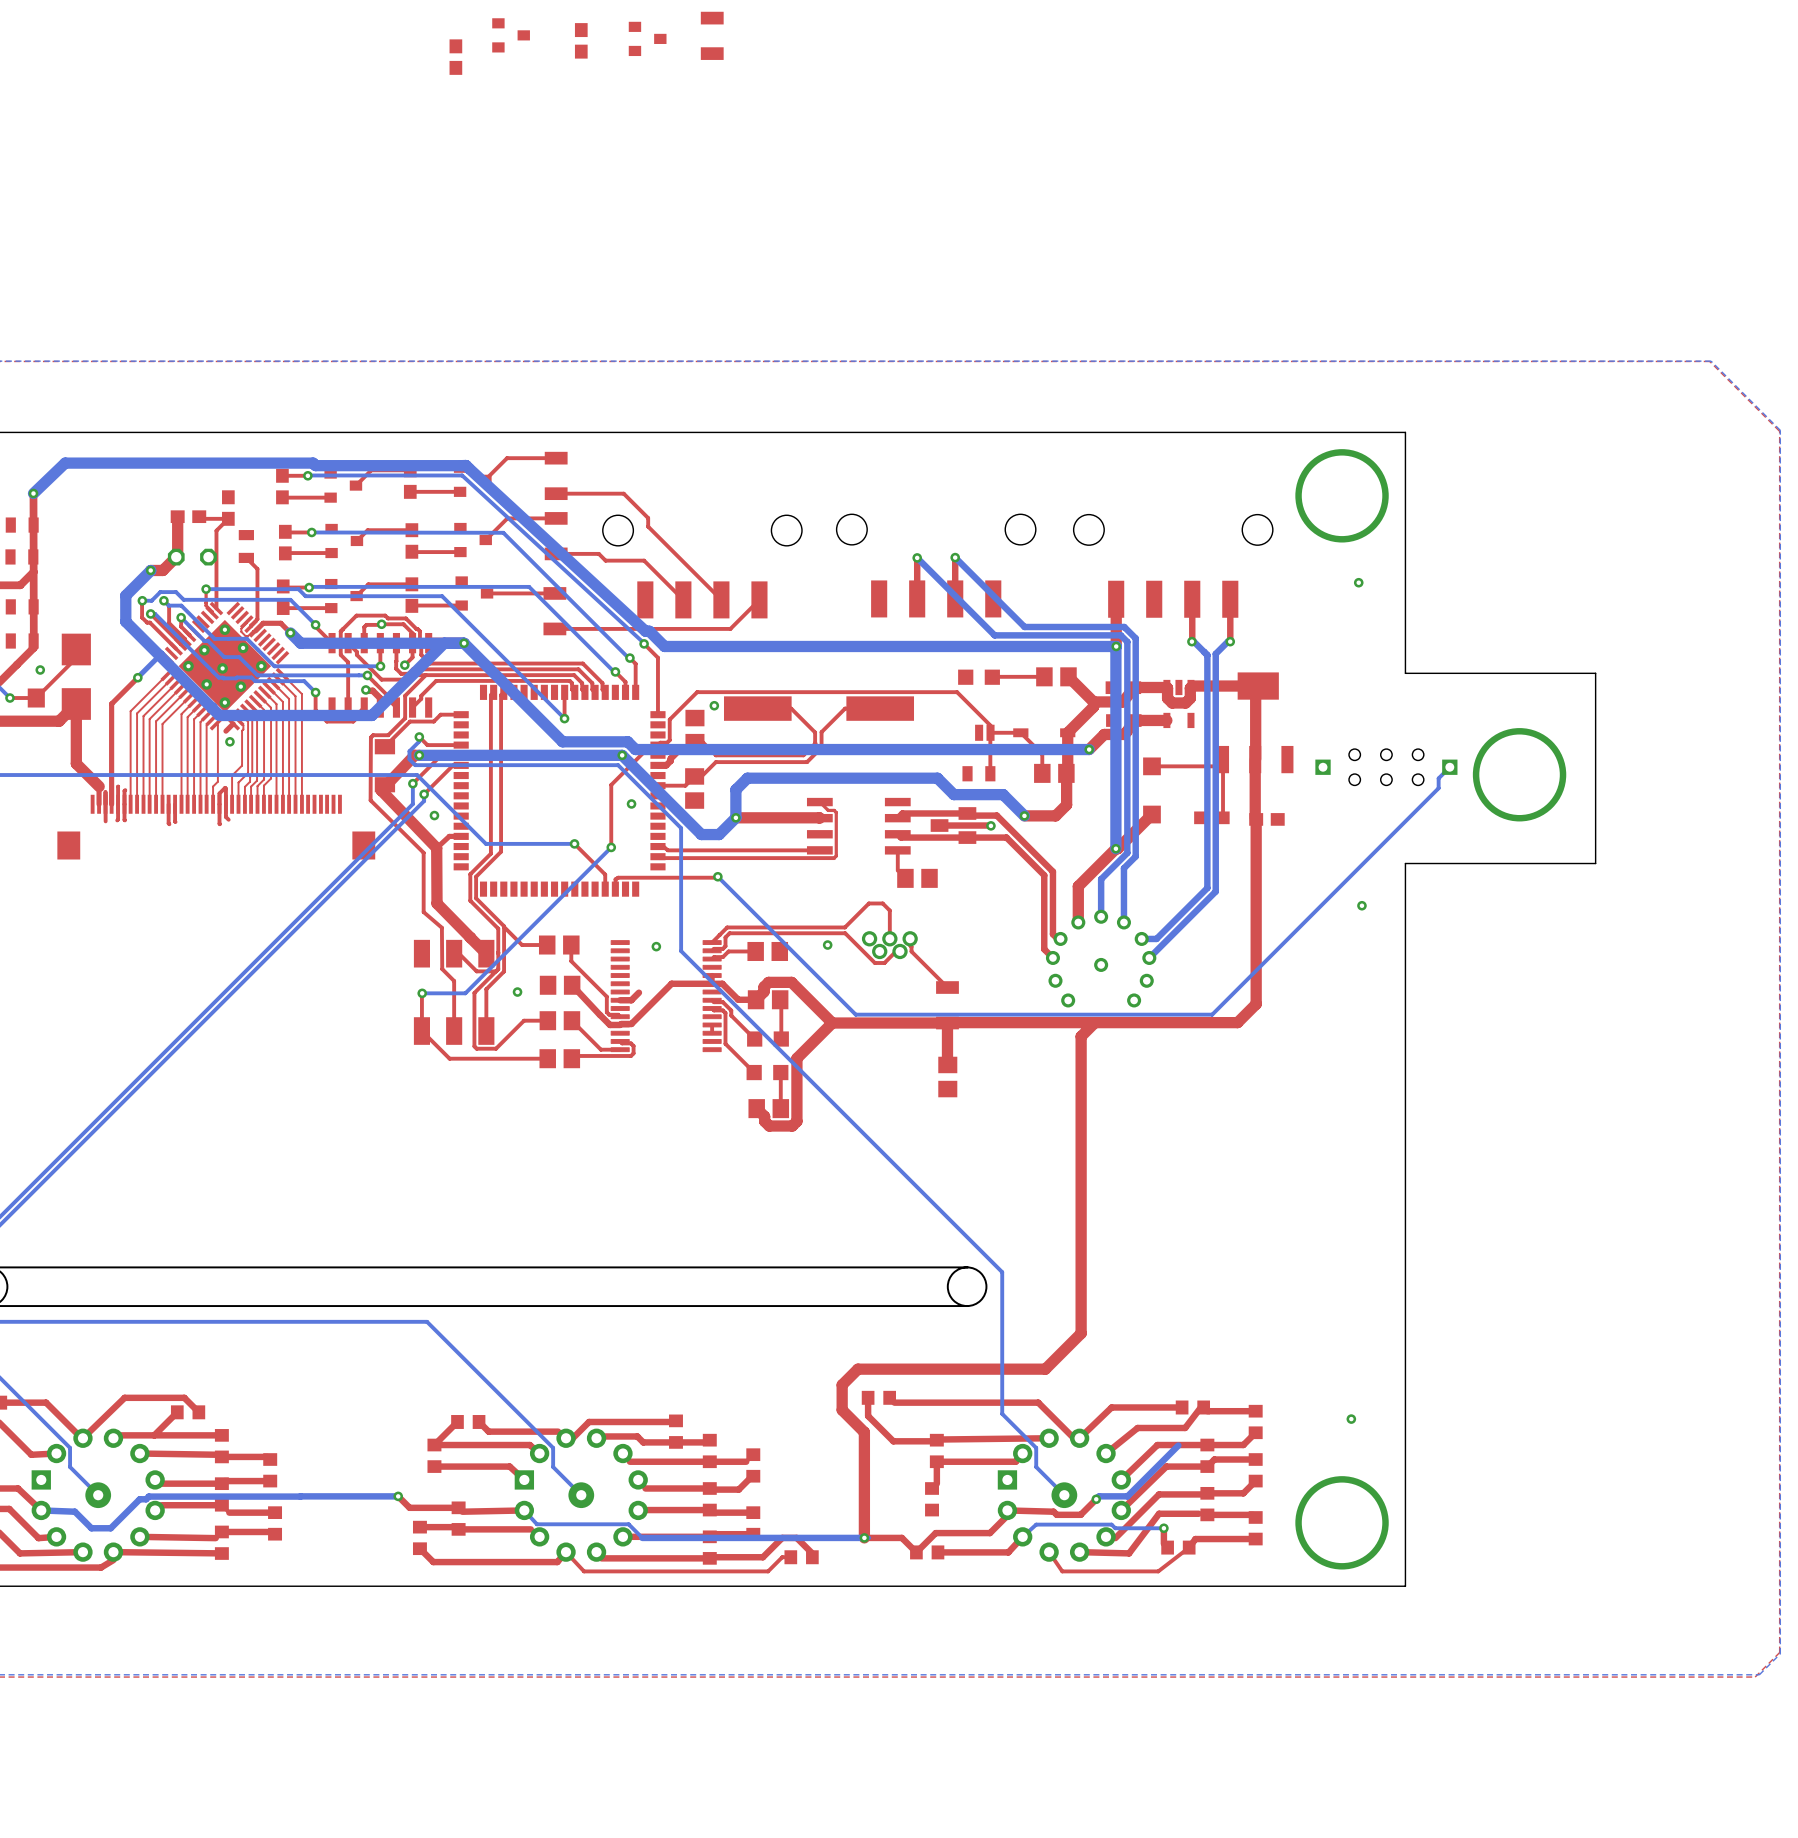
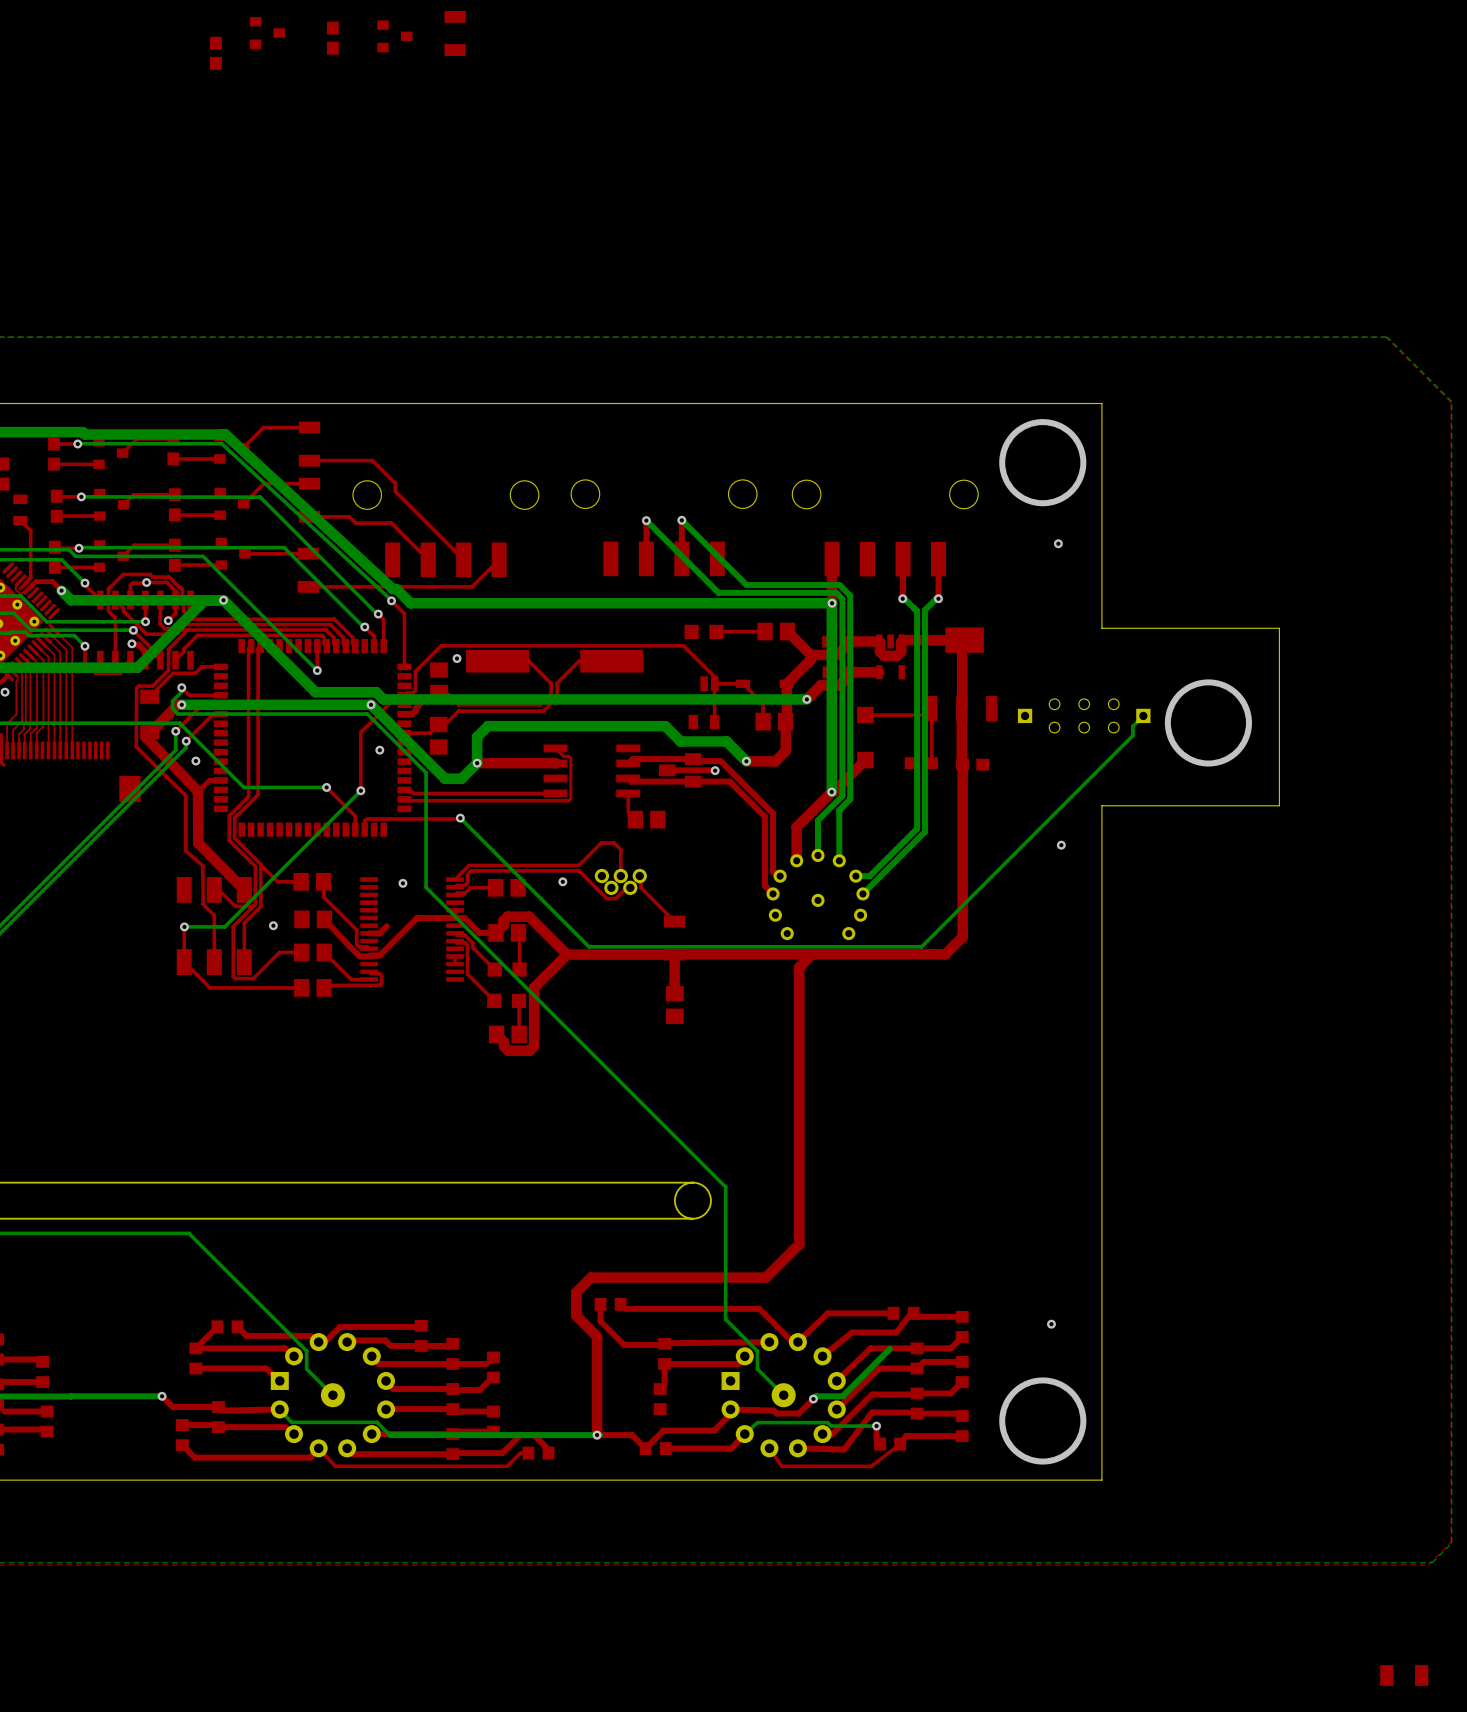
part: none -> (1404, 1675)

